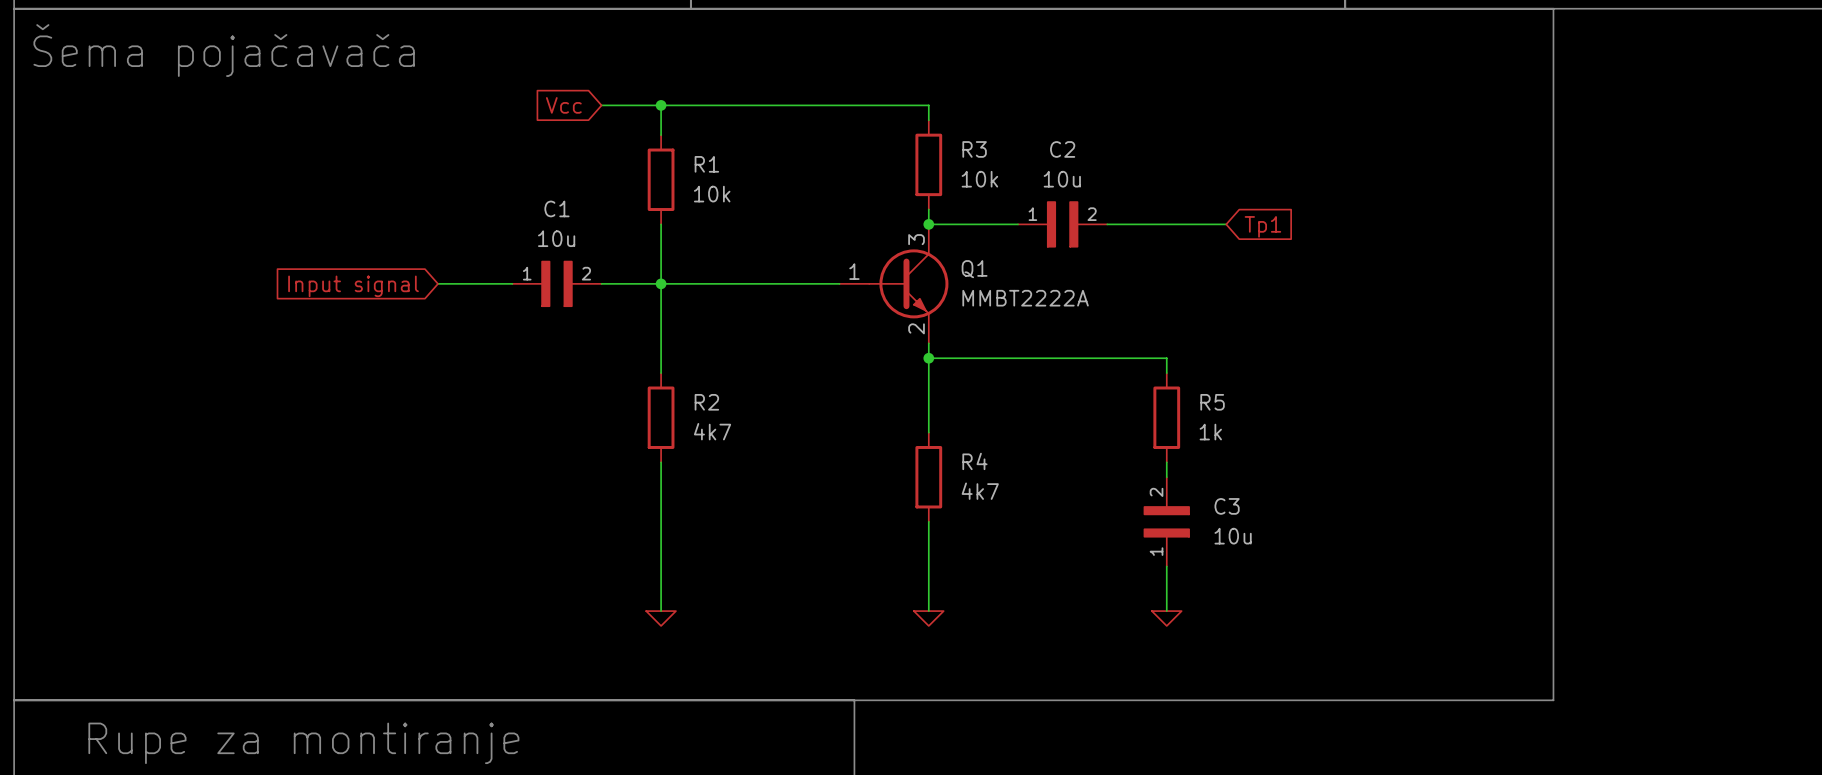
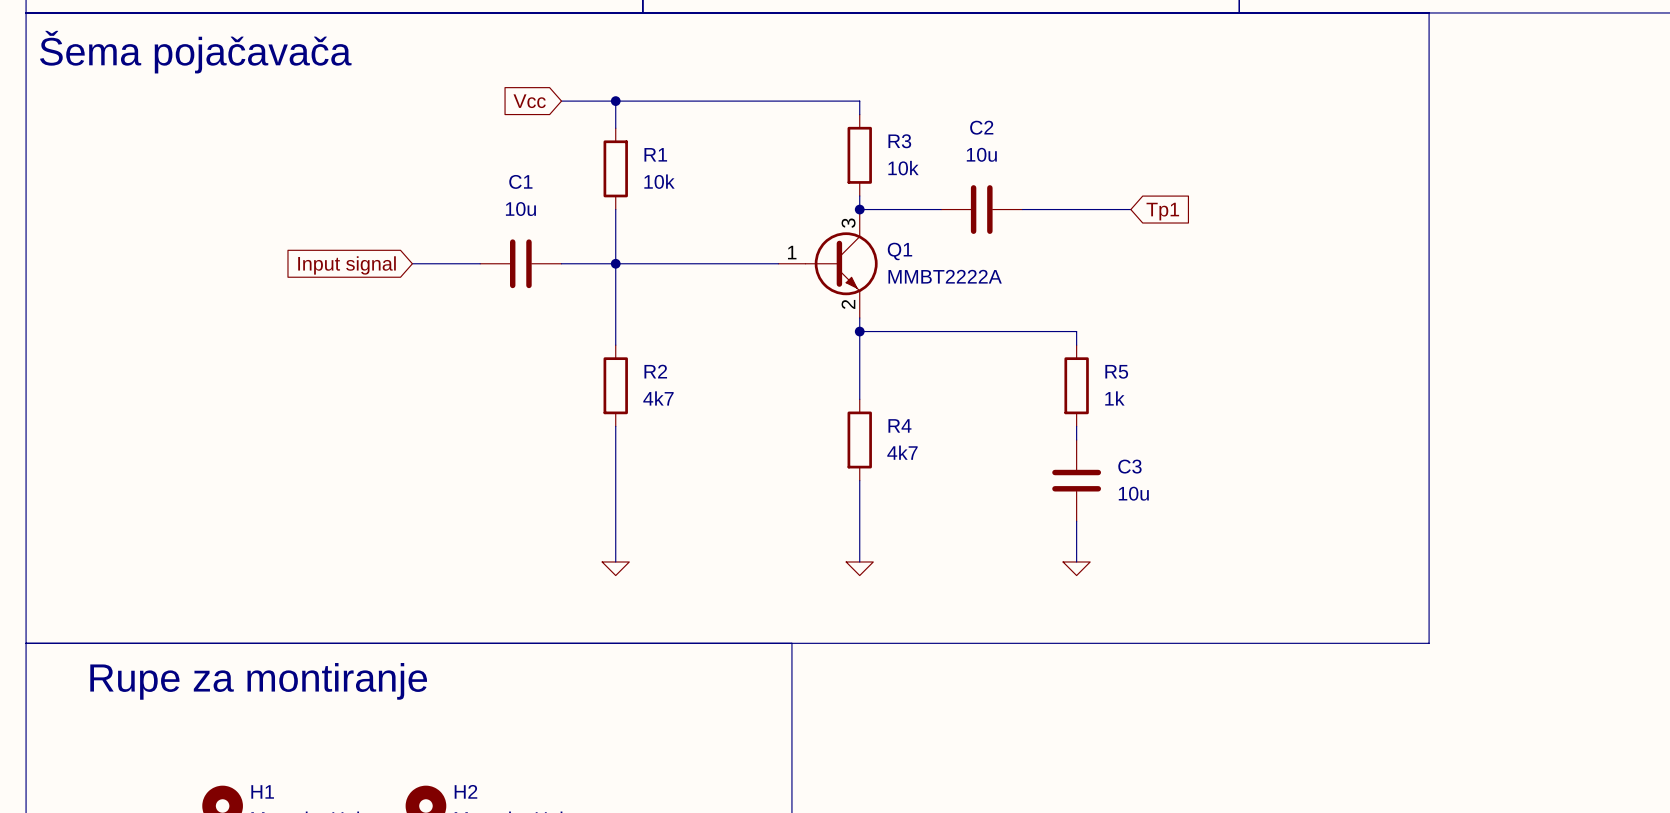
C2 symbol: [1018, 201, 1108, 248] -> [941, 185, 1023, 234]
C1 symbol: [512, 260, 602, 307] -> [480, 239, 562, 289]
C3 symbol: [1143, 477, 1190, 567] -> [1052, 439, 1102, 522]

